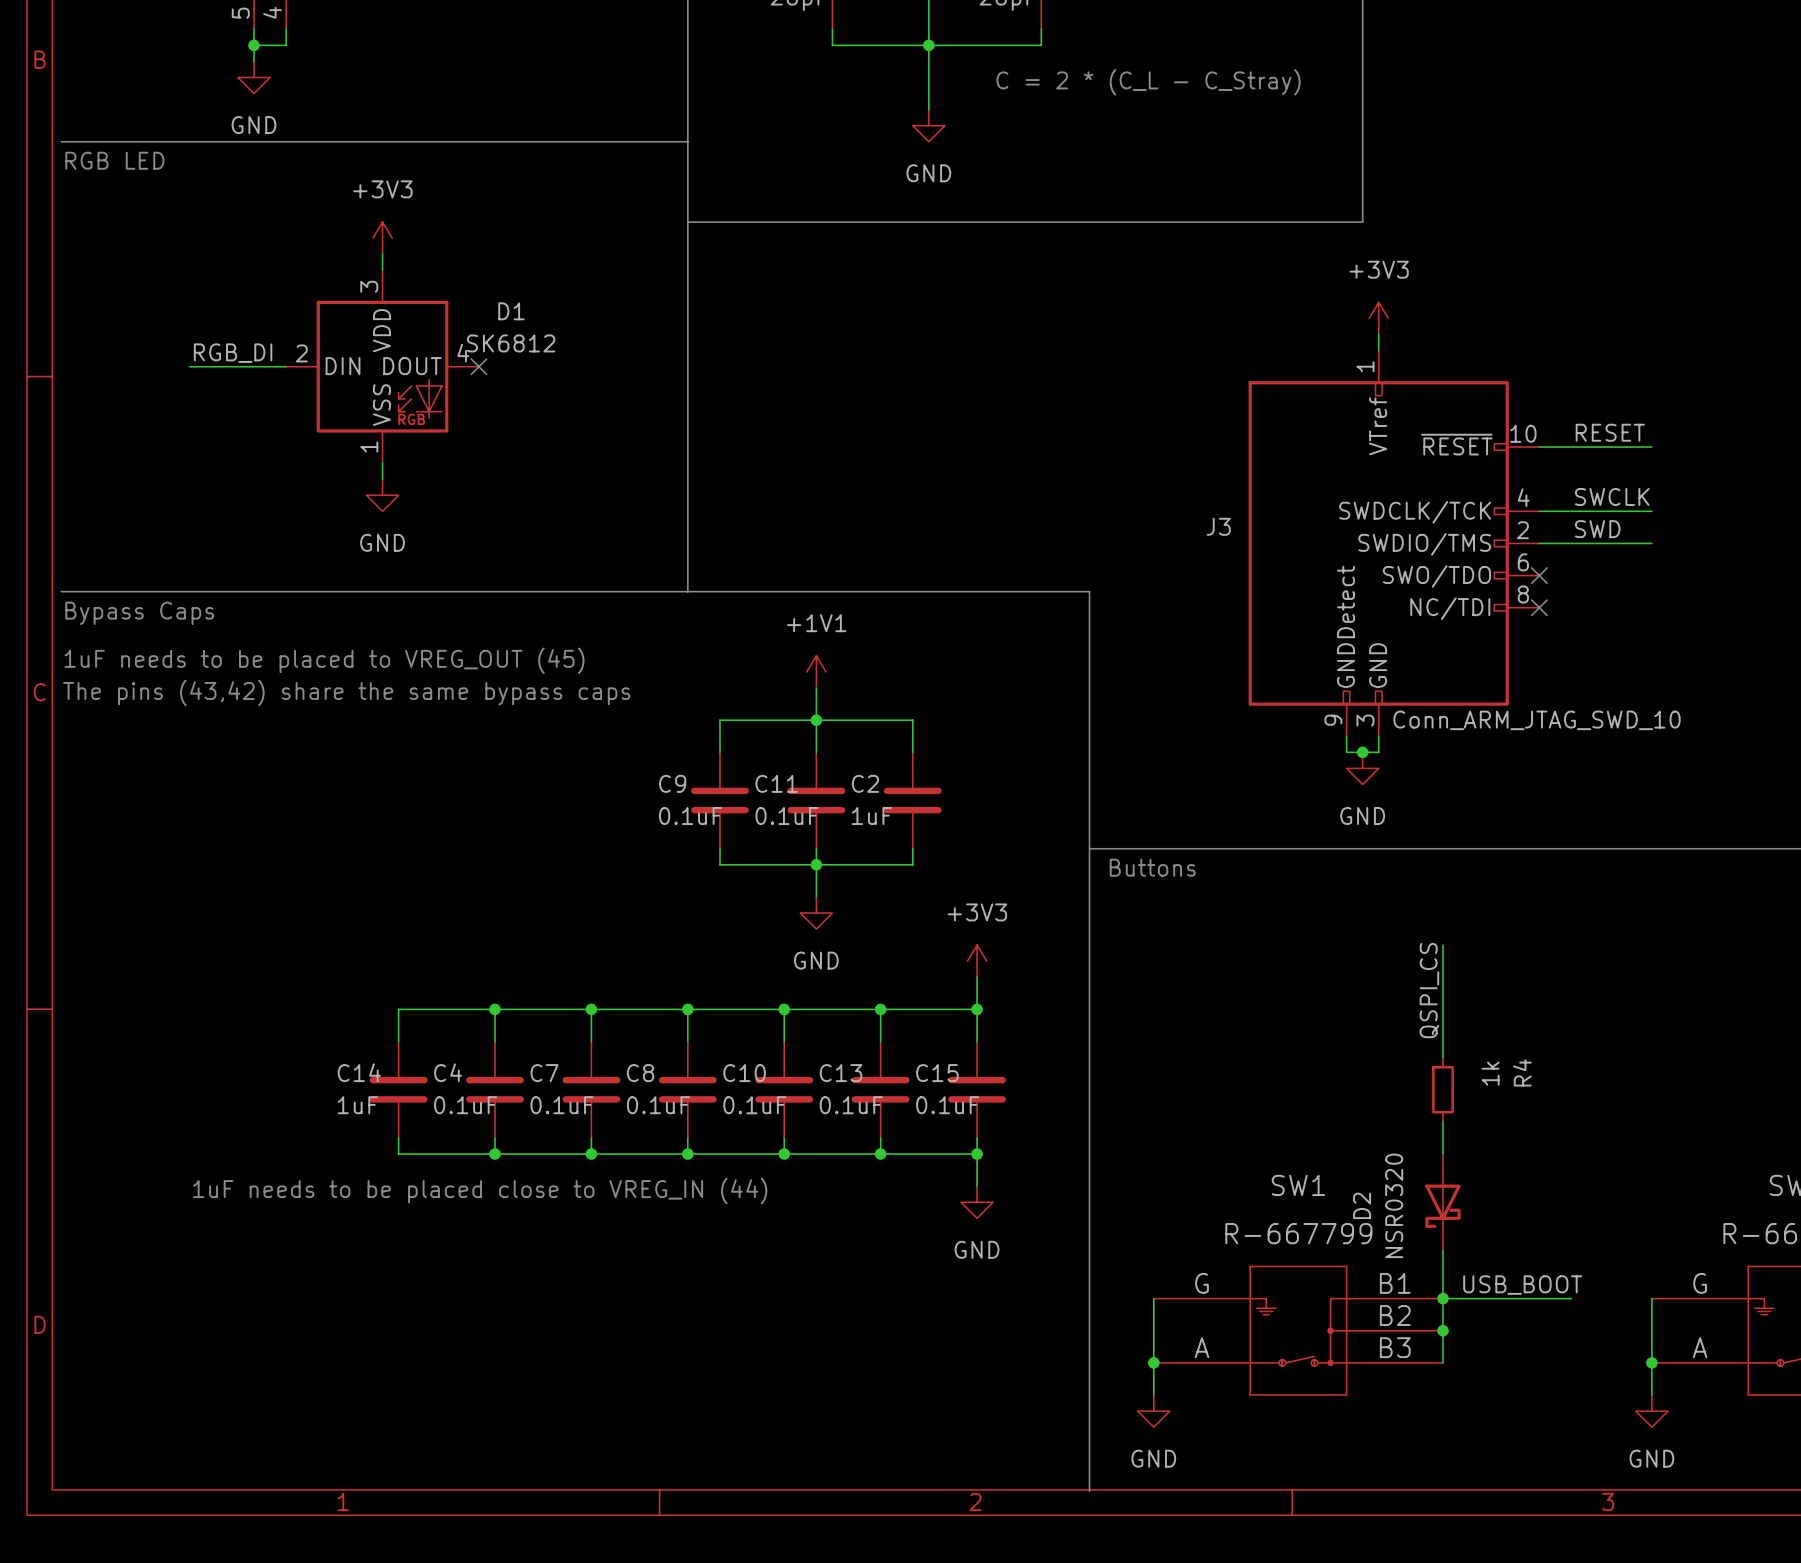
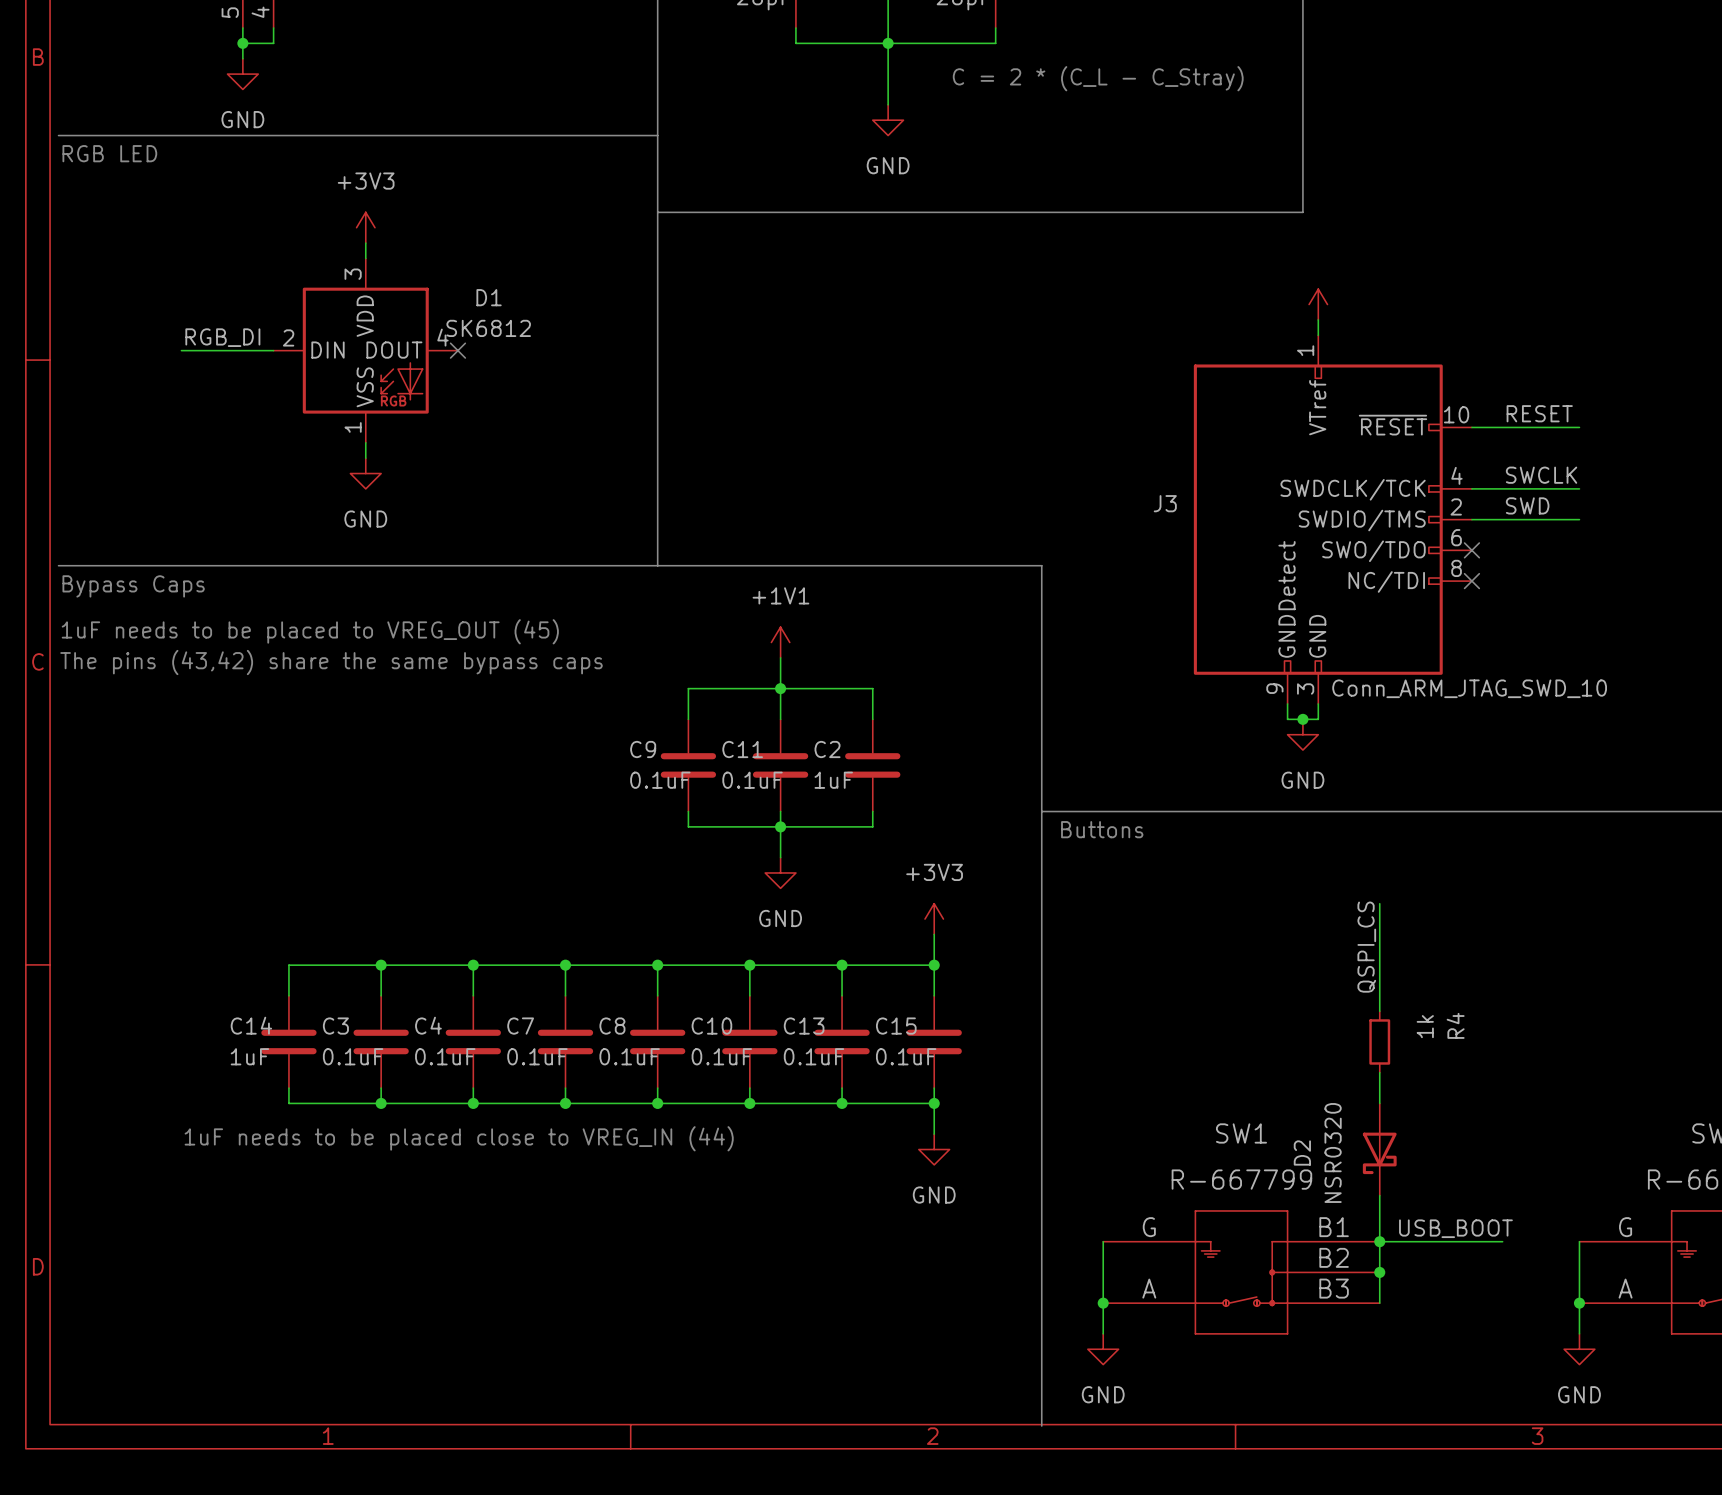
power symbol text: +3V3 (1379, 269) -> none
wire: none -> (381, 965) (288, 965) (288, 995)
junction: none -> (381, 965)
C14 name: C14 (359, 1072) -> C3 (335, 1026)
C14: none -> 1uF (288, 1041)
C14 value: 1uF (357, 1105) -> 0.1uF (353, 1056)
wire: none -> (288, 1088) (288, 1103) (381, 1103)
junction: none -> (381, 1103)

